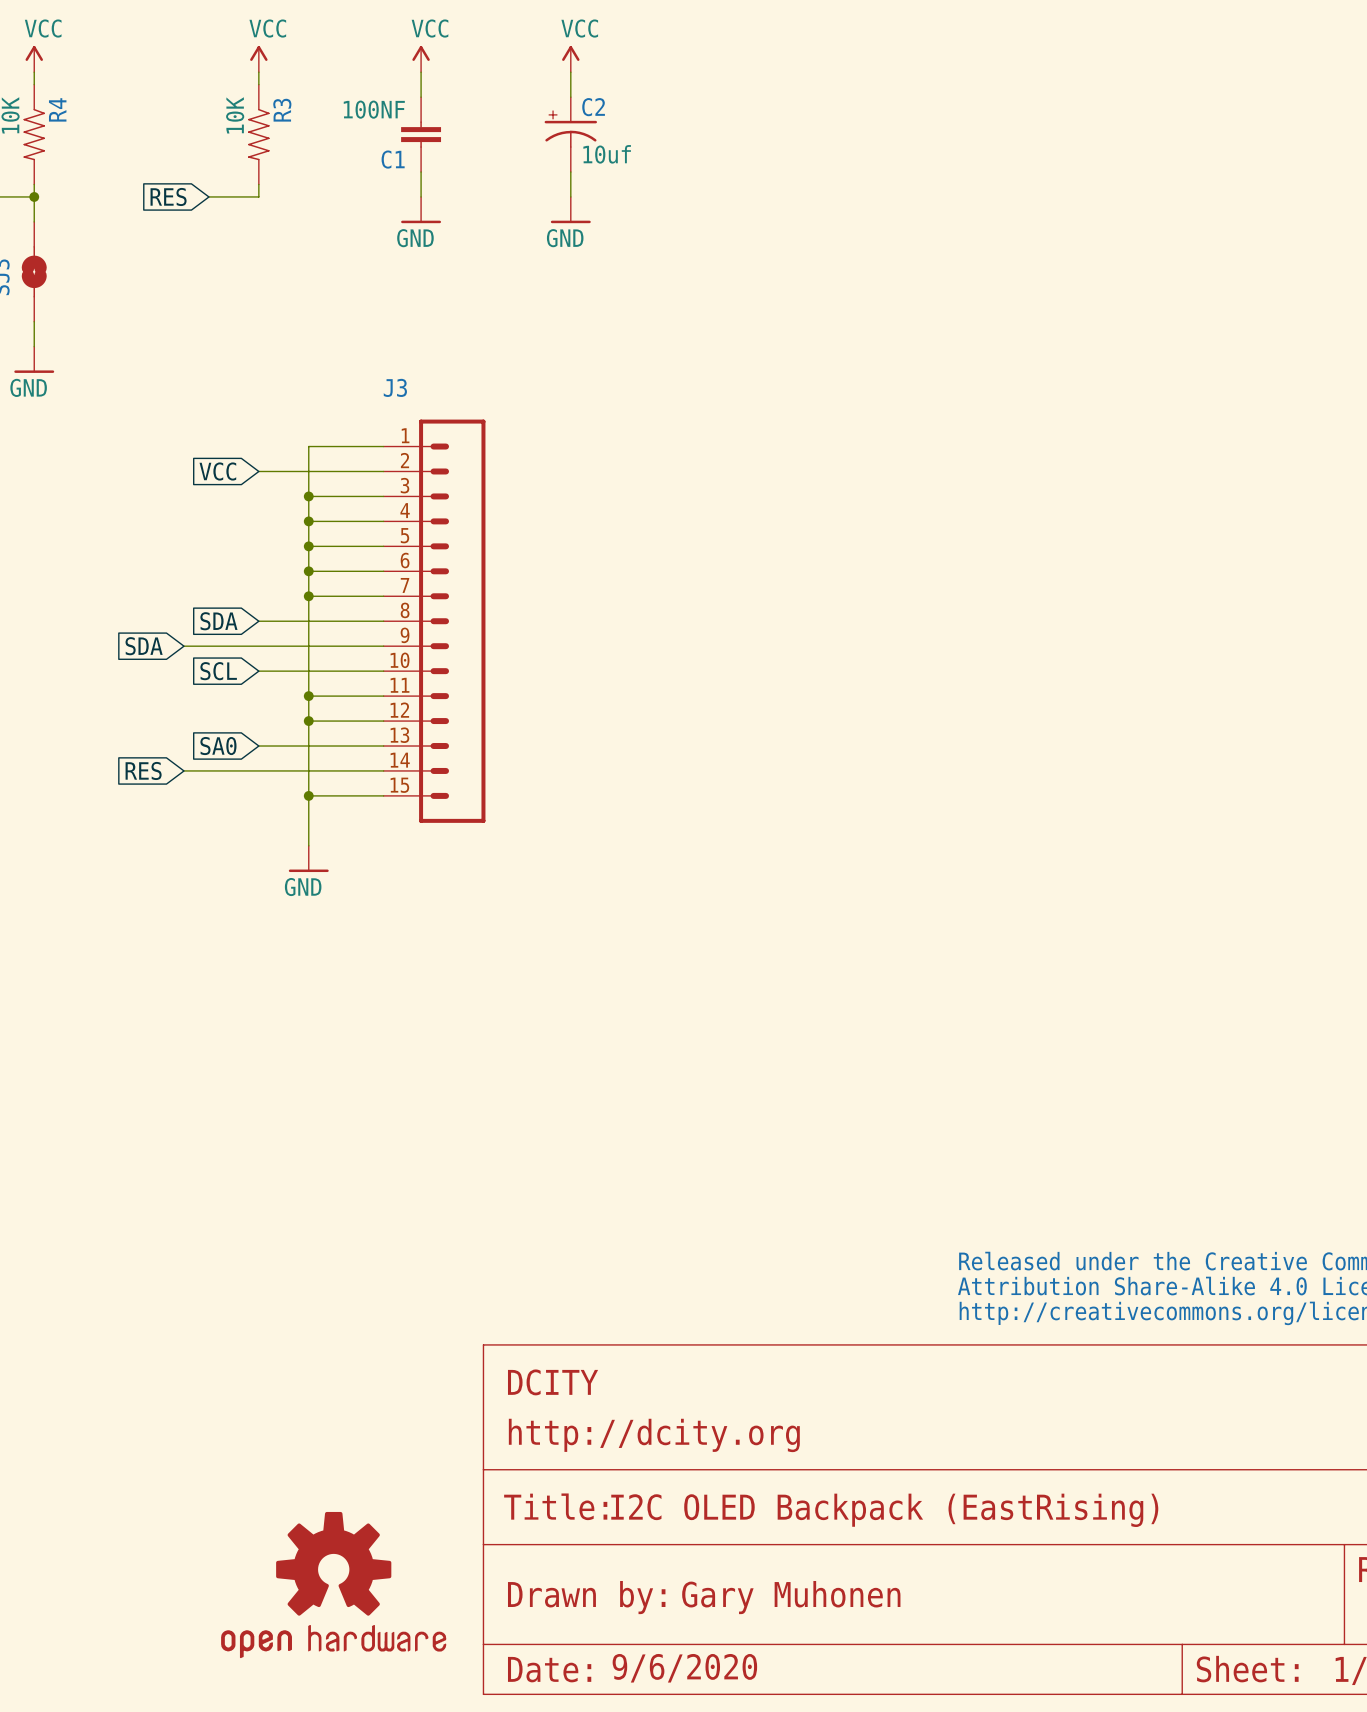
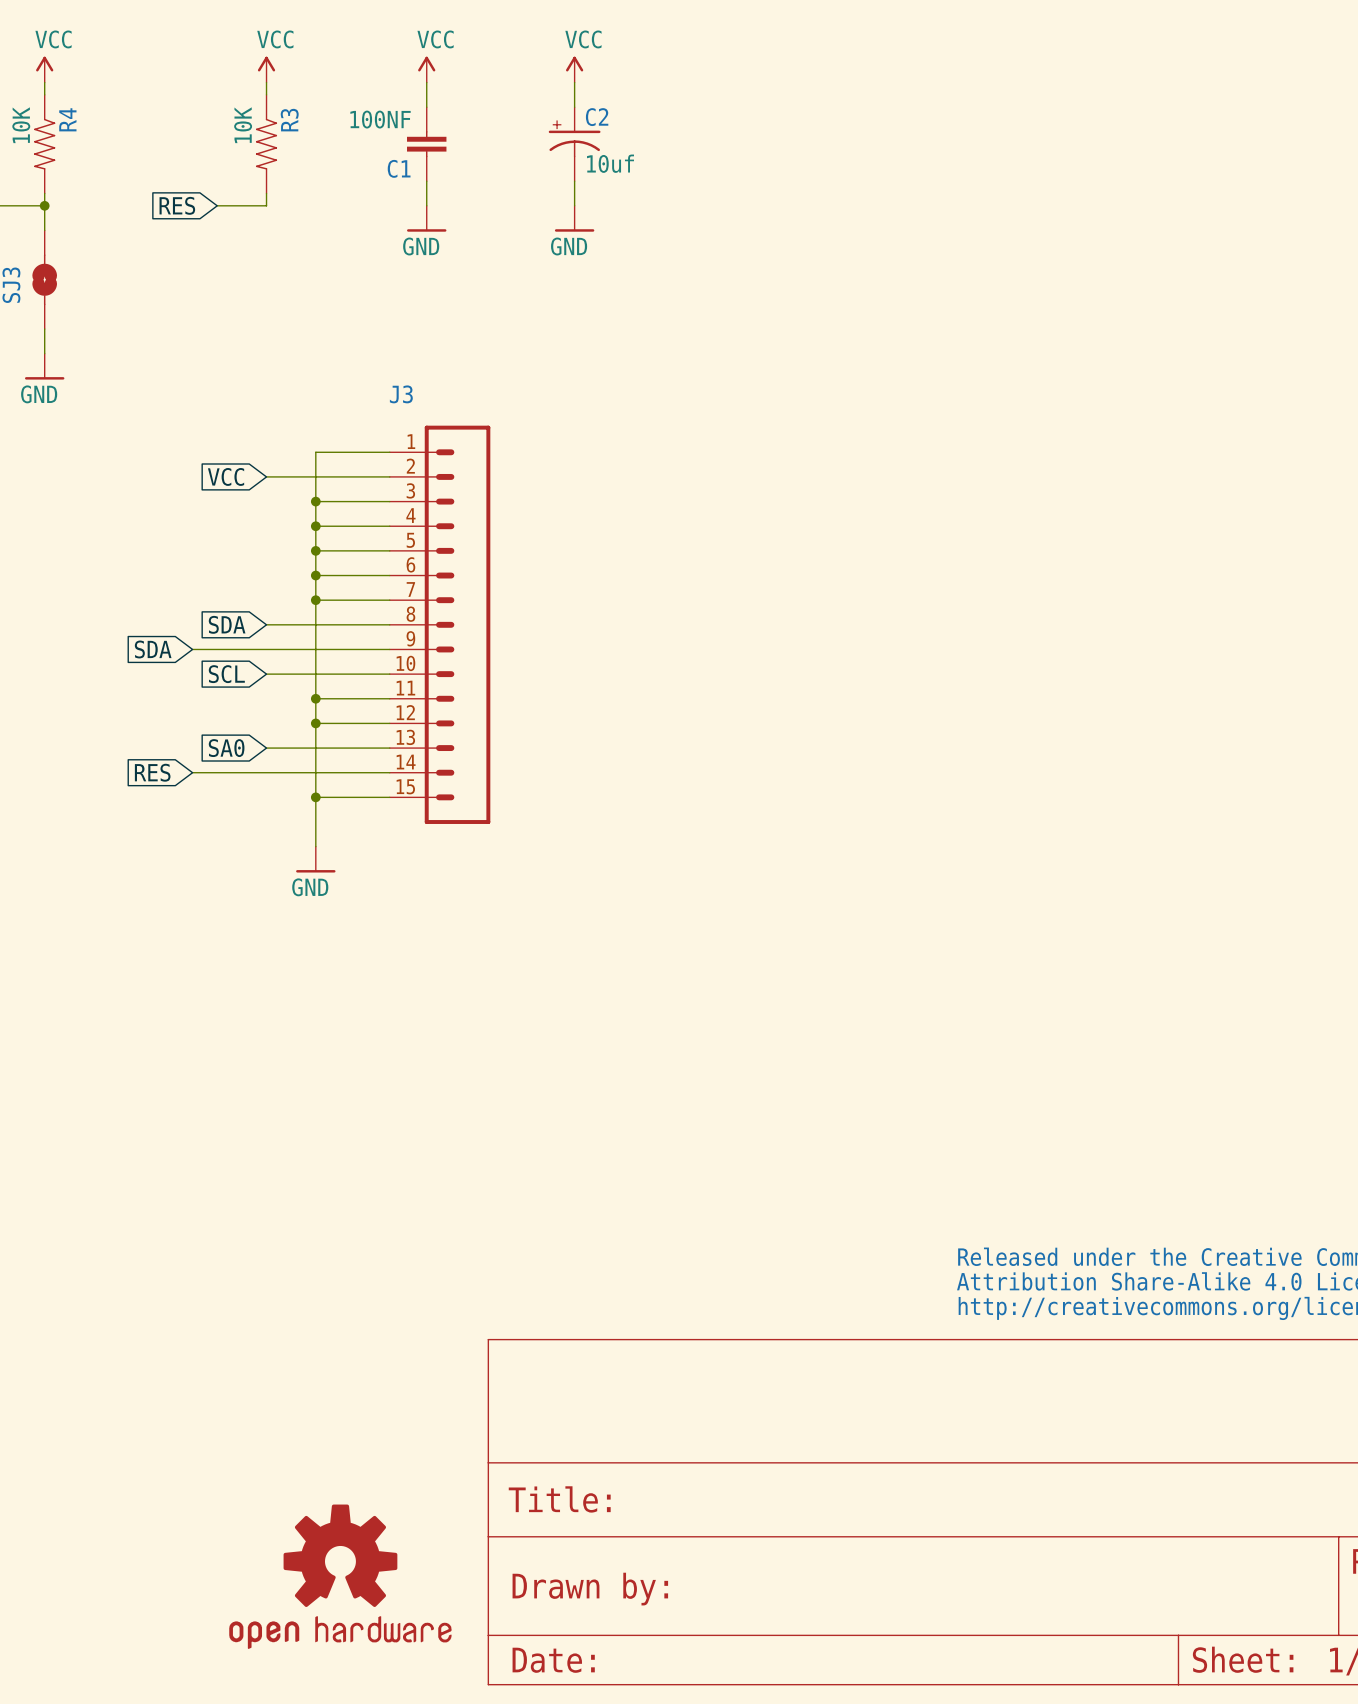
part text: DCITY (553, 1382) -> none
part text: http://dcity.org (654, 1435) -> none
part text: I2C OLED Backpack (EastRising) (884, 1510) -> none
part text: Gary Muhonen (791, 1597) -> none
part text: 9/6/2020 (684, 1668) -> none

